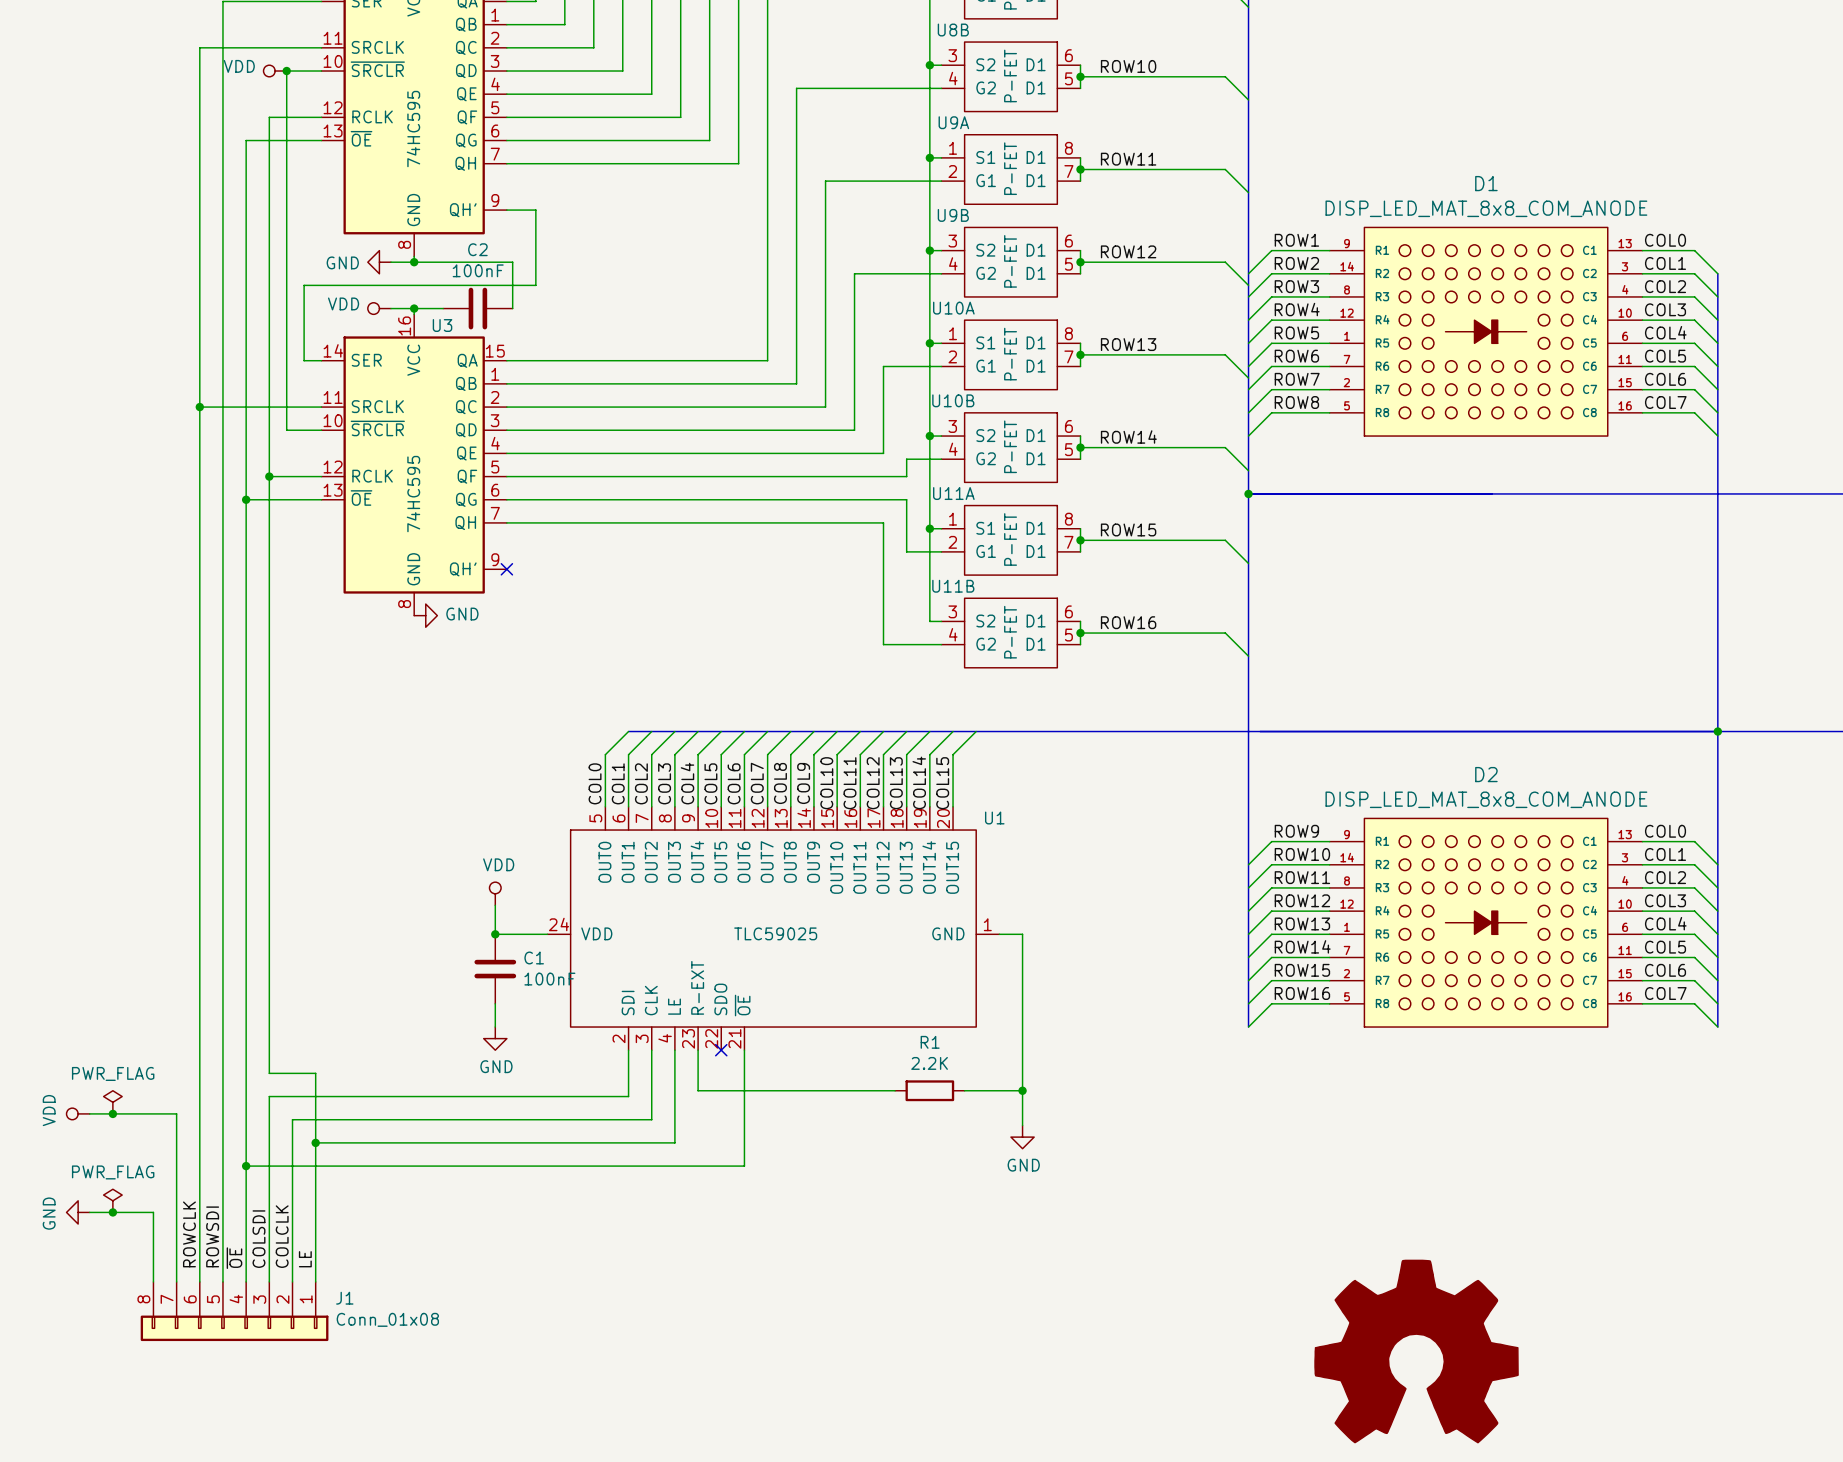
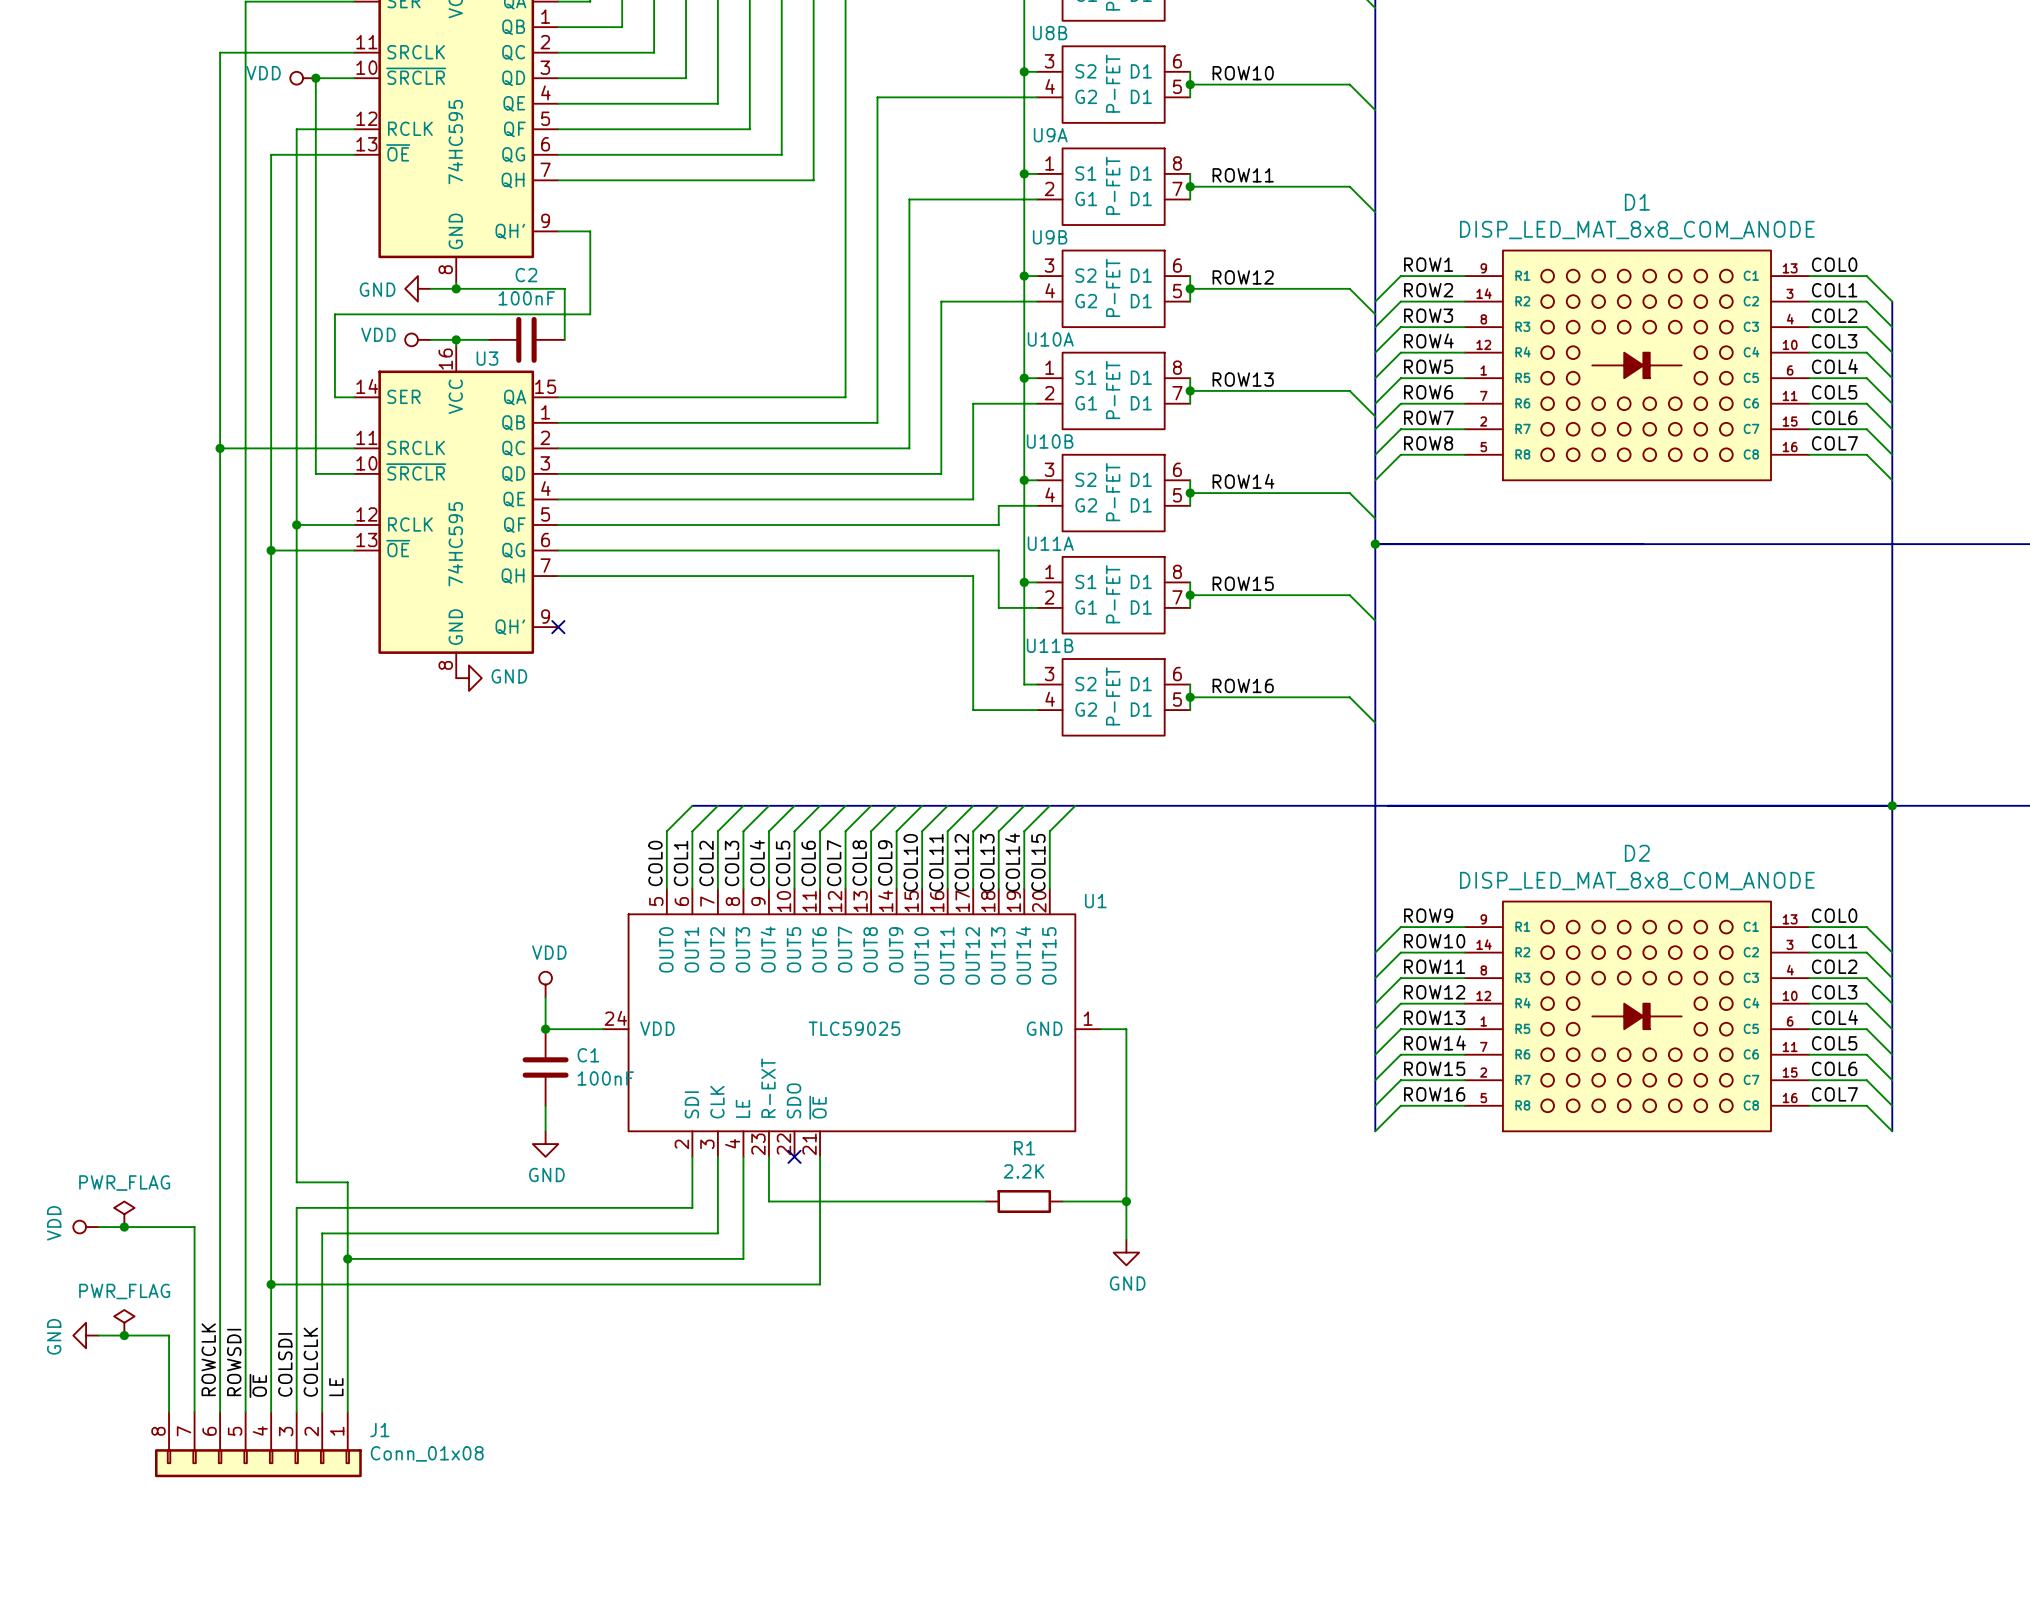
power symbol: (1416, 1351) -> none

